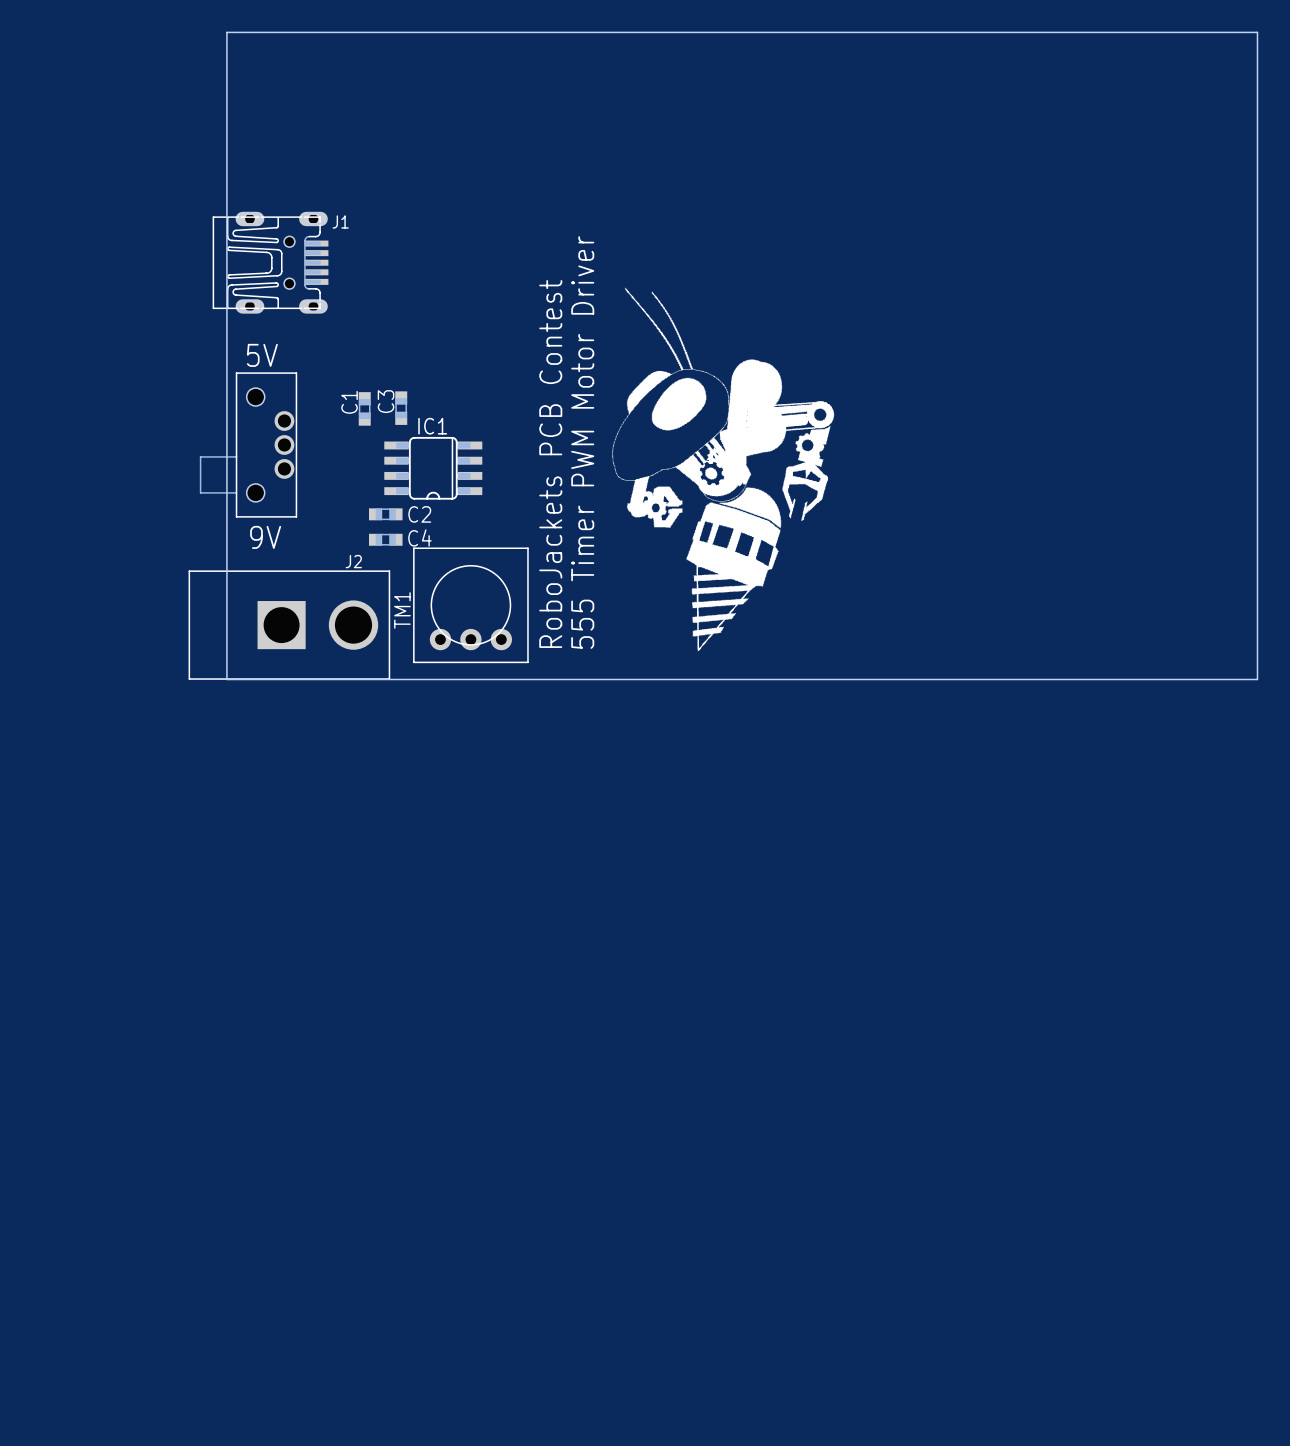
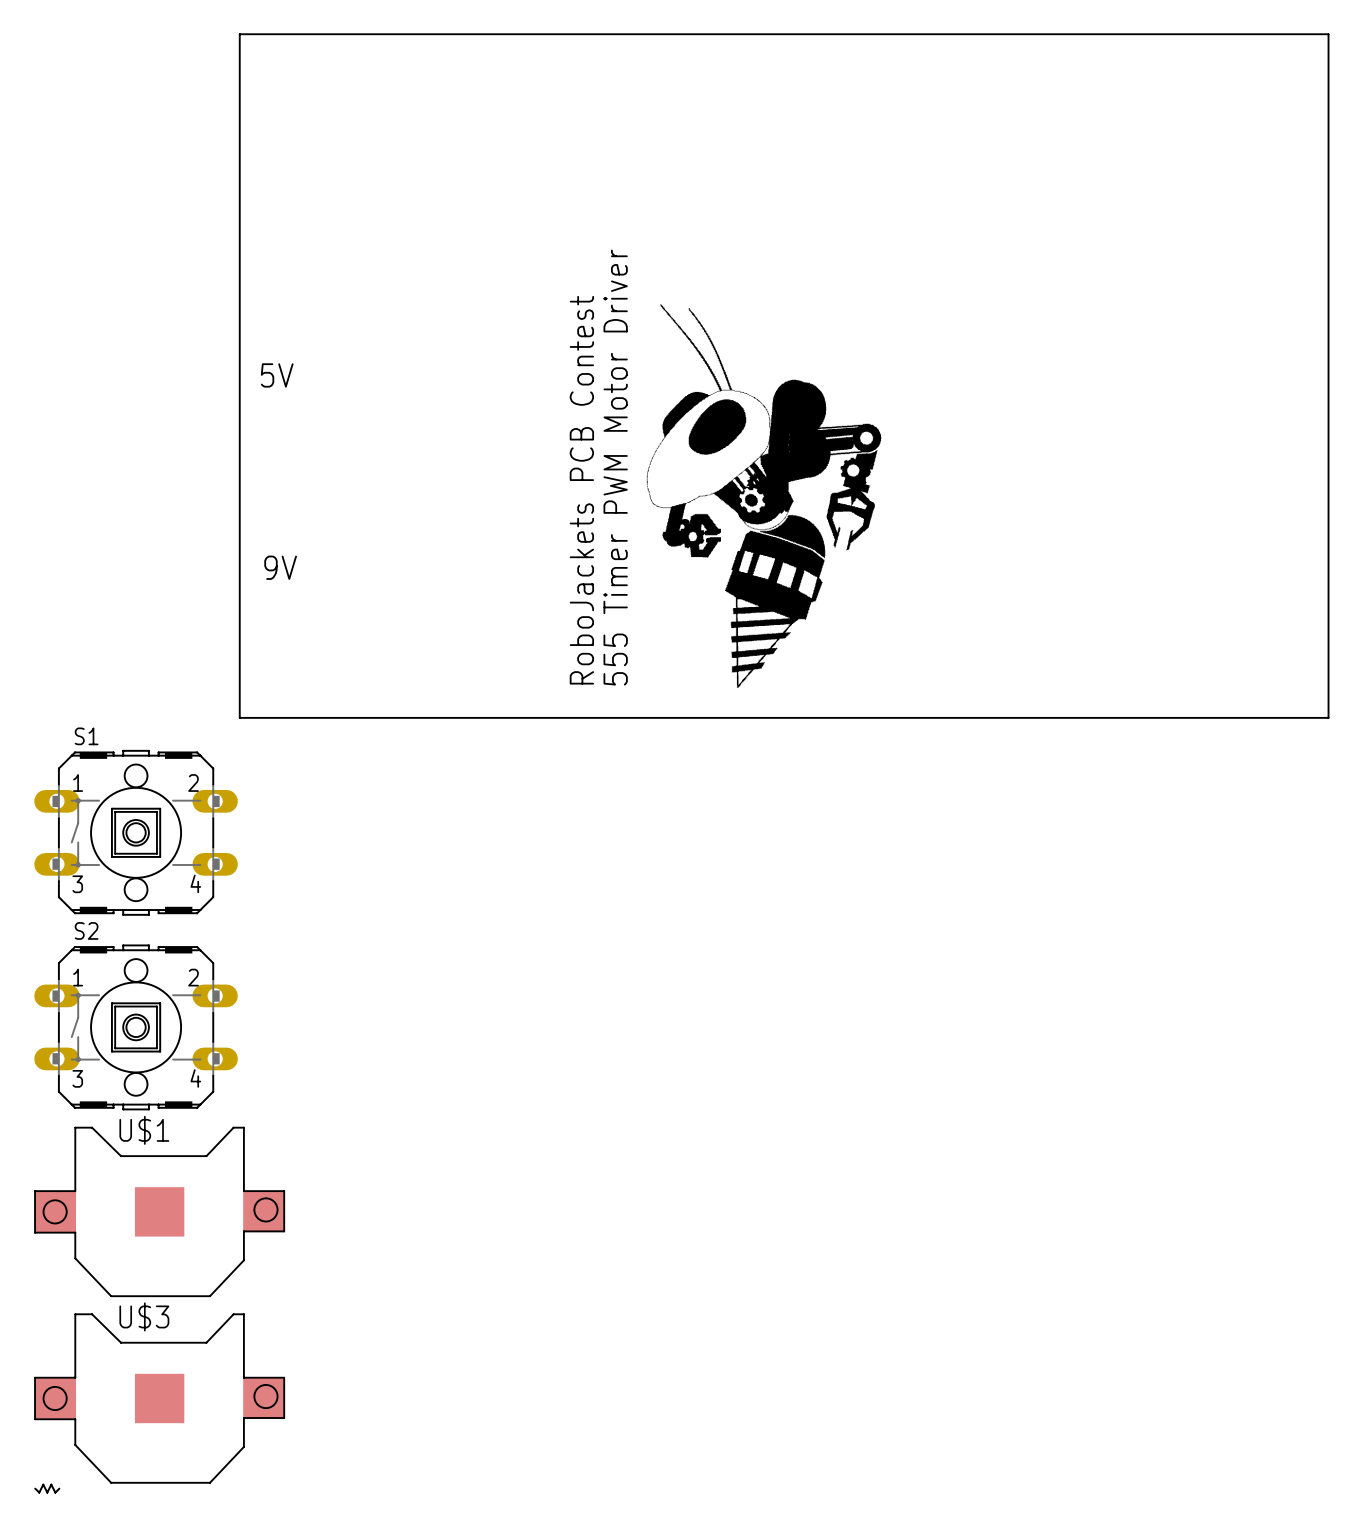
J1: (270, 262) -> none
C1: (364, 408) -> none
C3: (401, 408) -> none
part: (248, 444) -> none
IC1: (433, 468) -> none
C2: (385, 514) -> none
C4: (385, 539) -> none
TM1: (470, 605) -> none
J2: (289, 625) -> none
S1: none -> (136, 832)
S2: none -> (136, 1027)
U$1: none -> (159, 1211)
U$3: none -> (159, 1398)
part: none -> (47, 1488)

